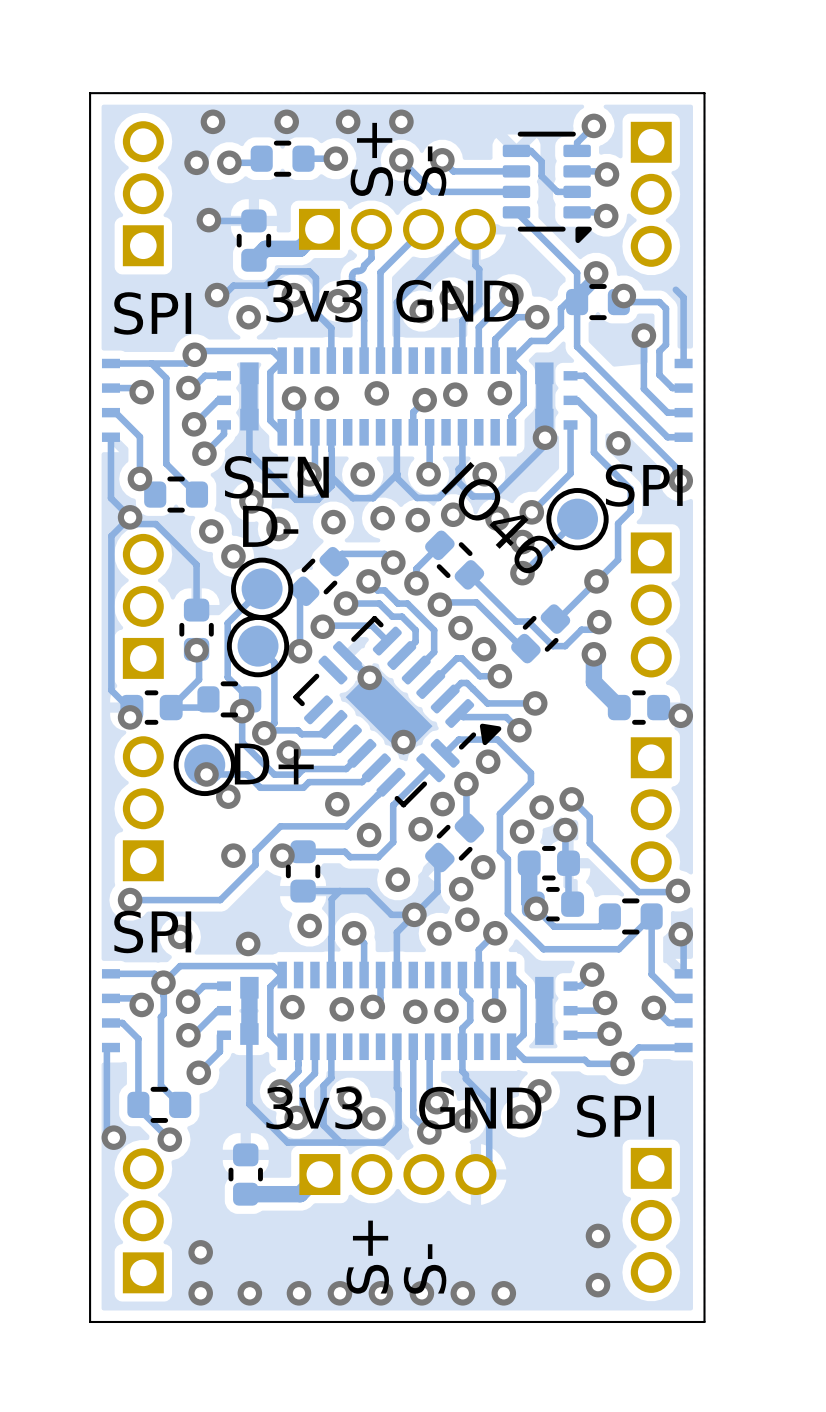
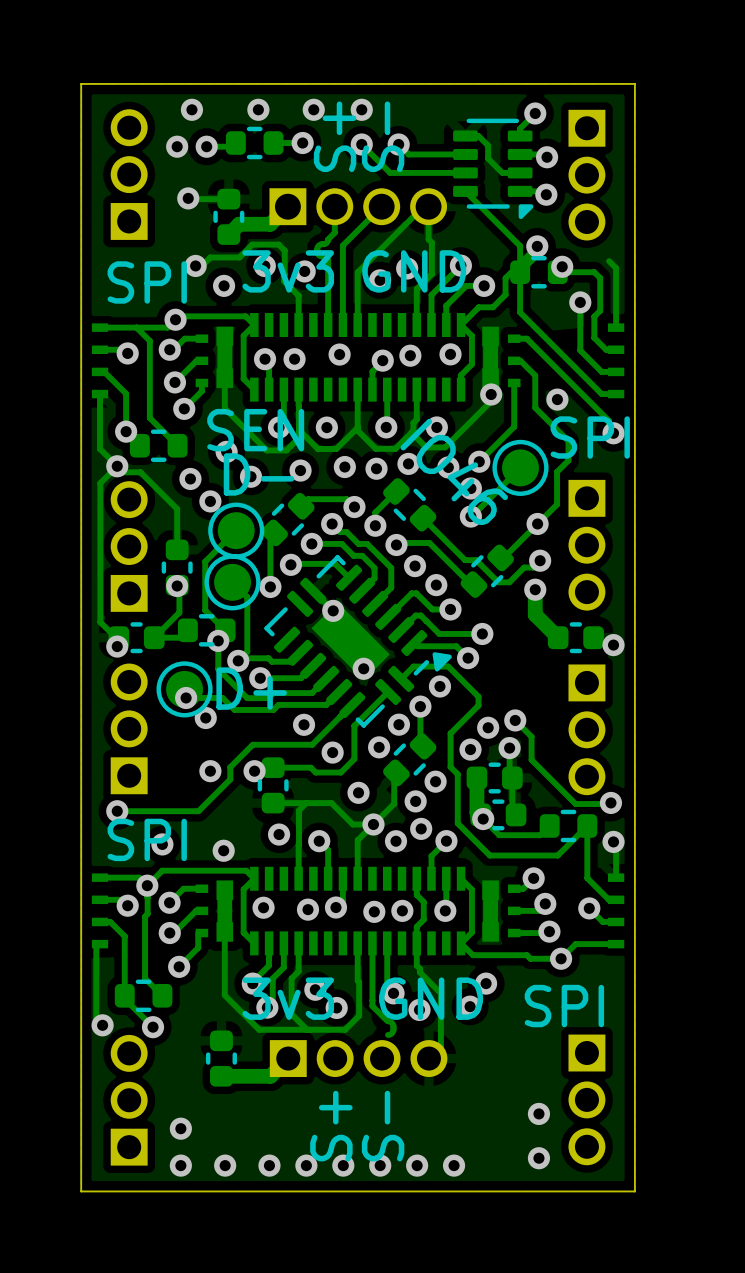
via: (429, 1132) -> none
track: none -> (388, 1021) (391, 1022) (393, 1026) (392, 1032) (388, 1034)

